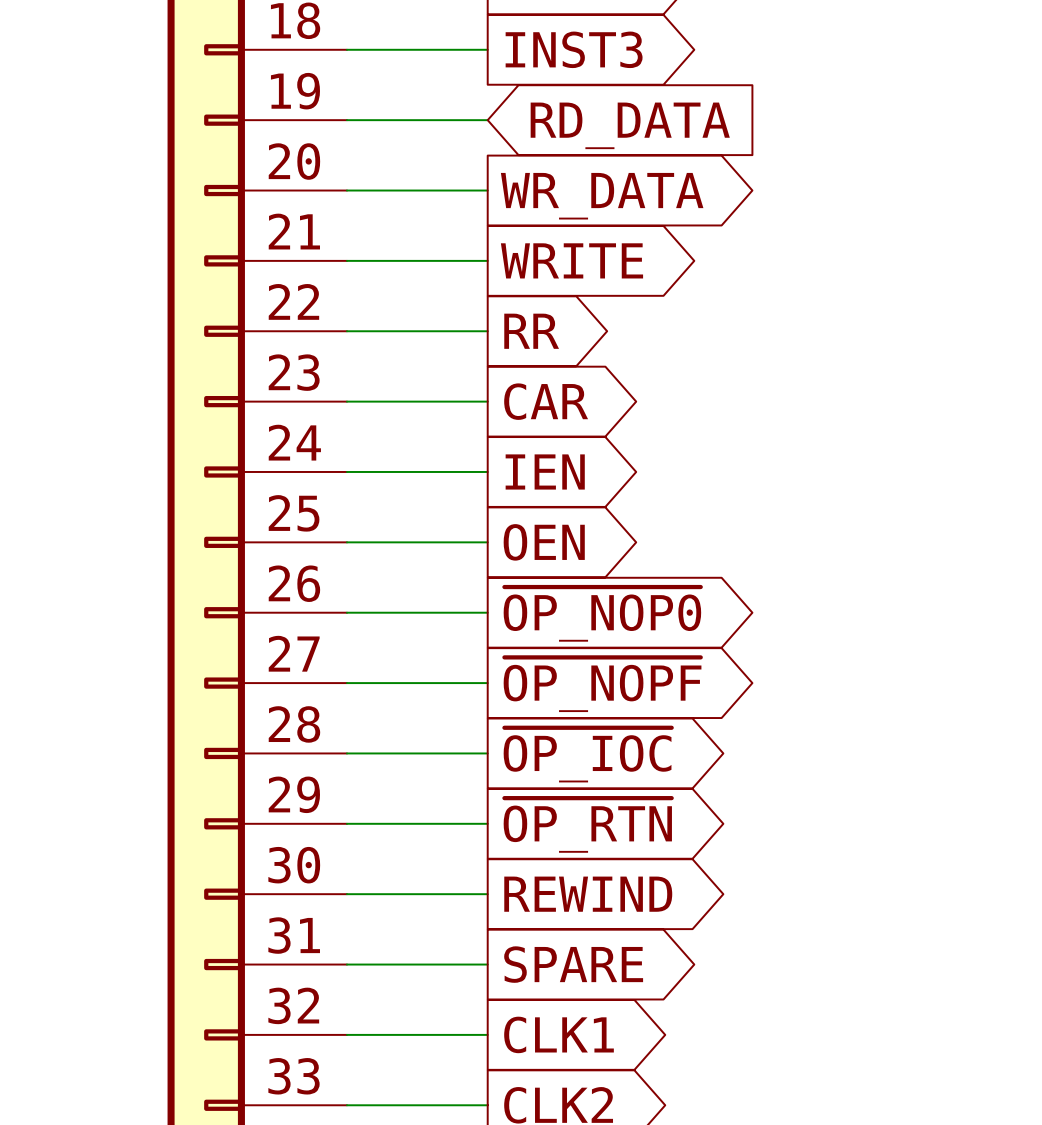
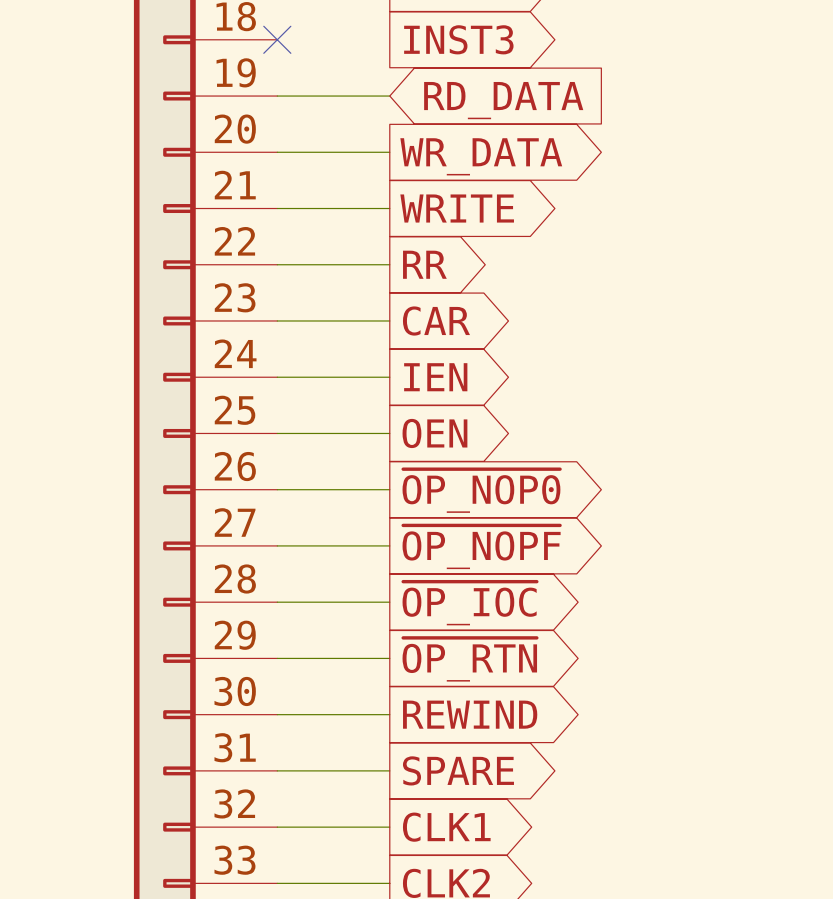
wire: (346, 49) (487, 49) -> none
no-connect mark: none -> (277, 39)

